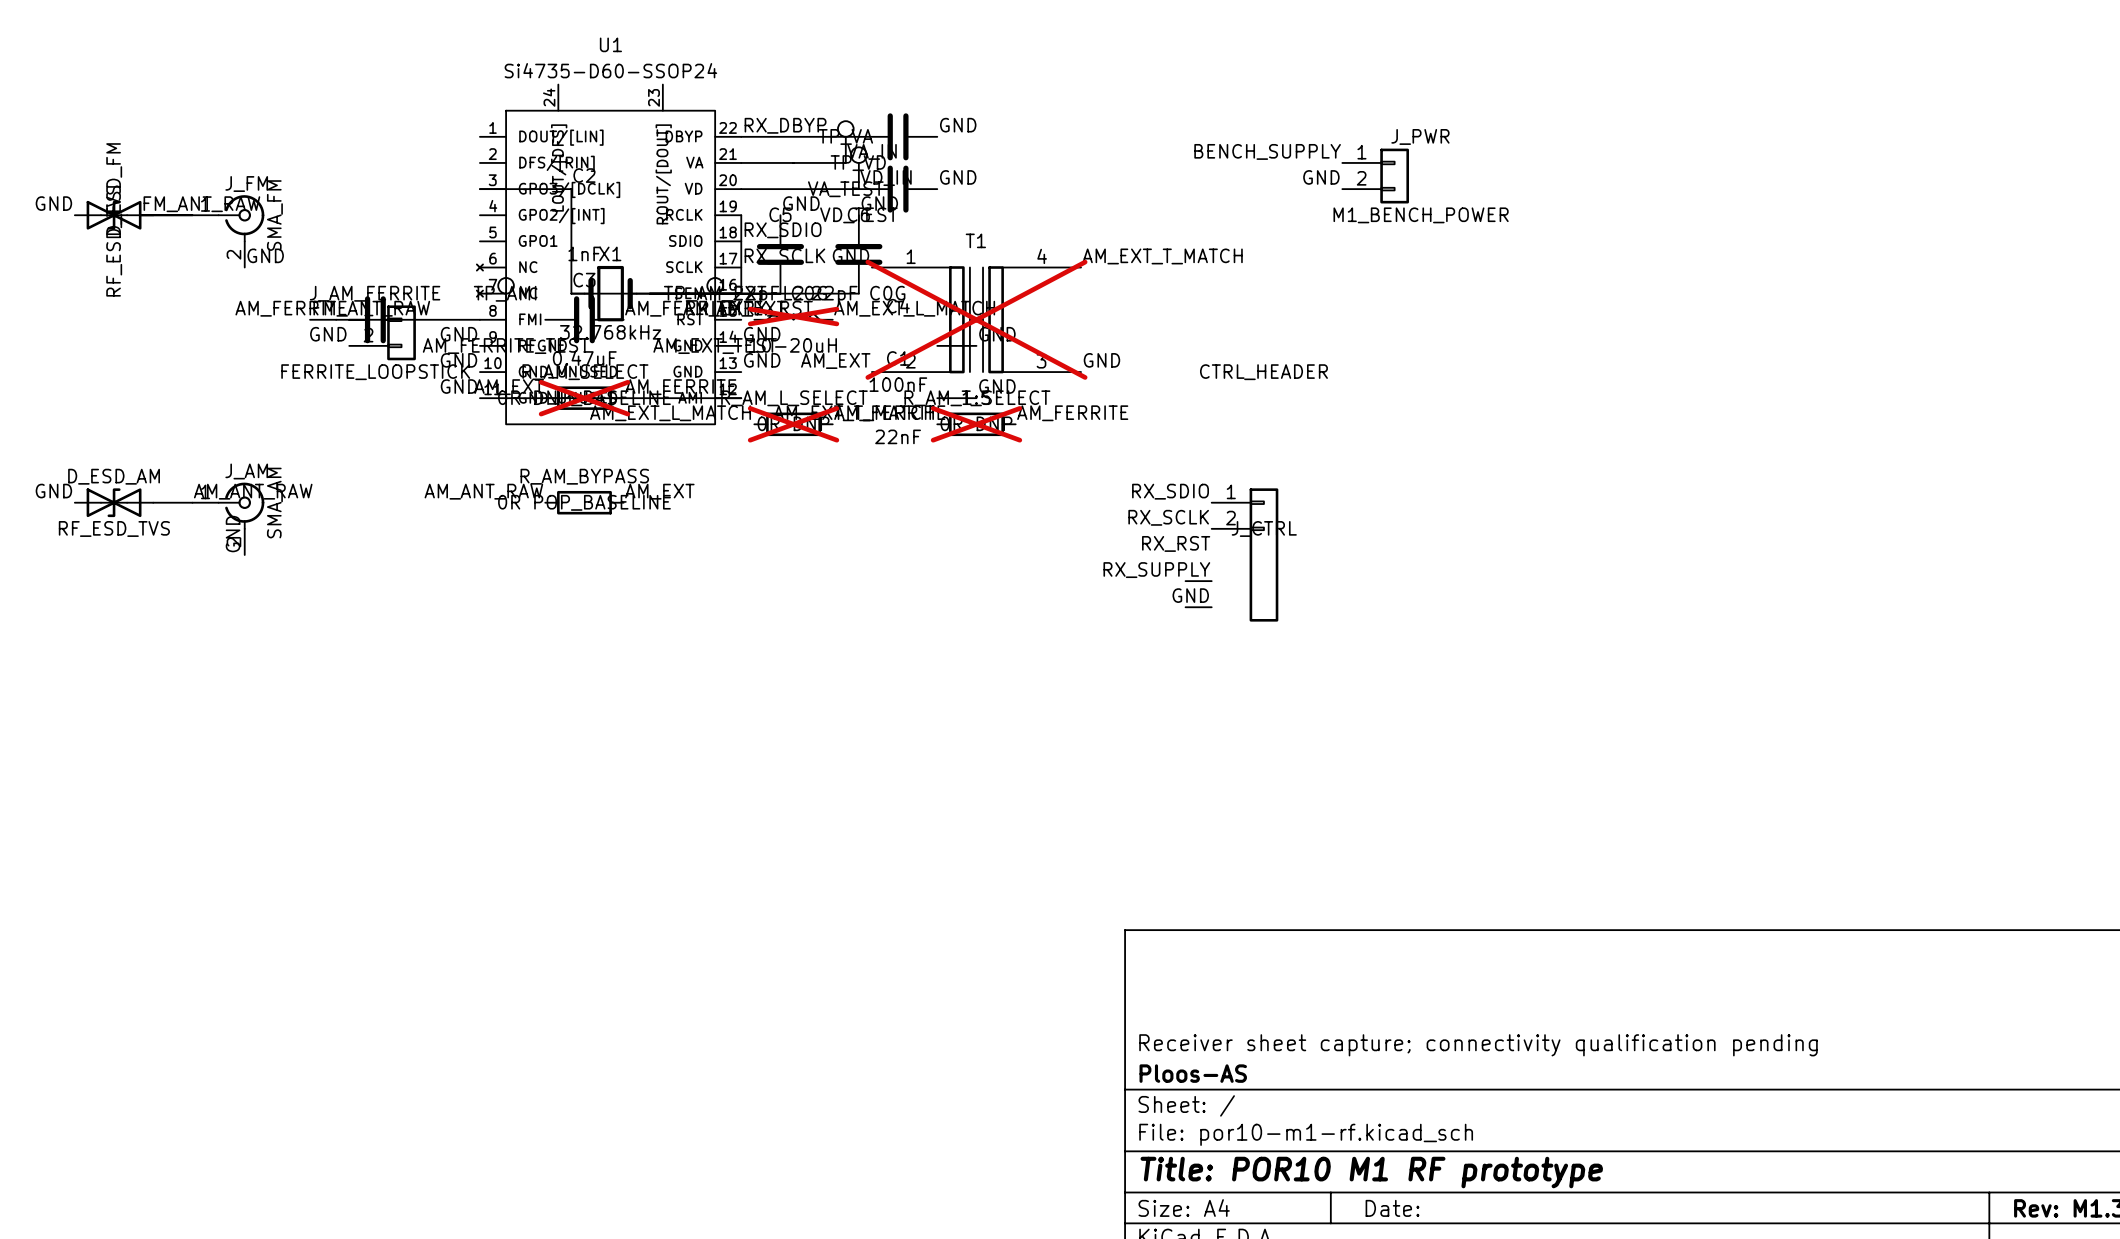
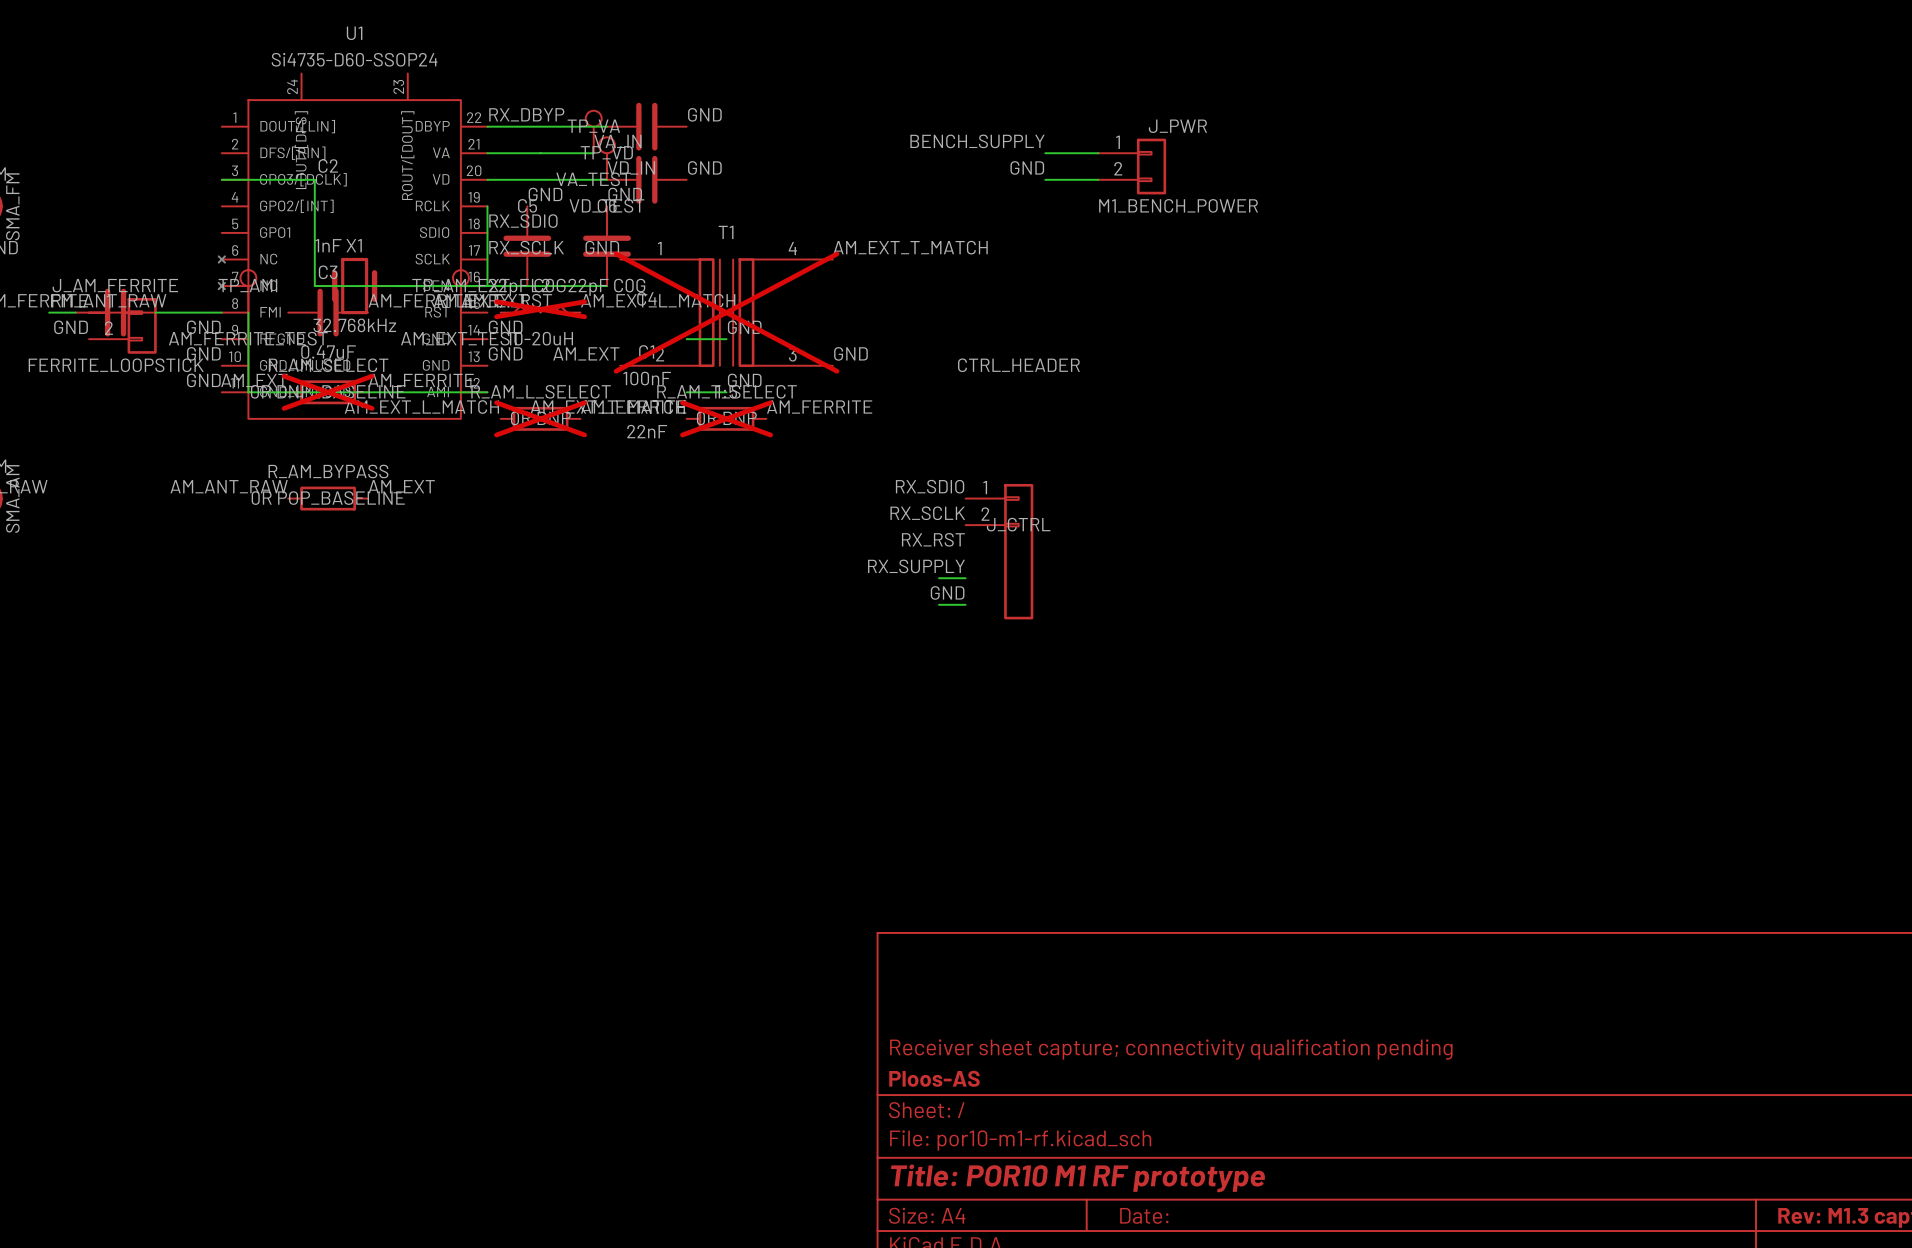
label position: BENCH_SUPPLY (1267, 151) -> BENCH_SUPPLY (977, 141)
wire: none -> (1045, 153) (1098, 153)
label position: GND (1321, 177) -> GND (1027, 167)
wire: none -> (1045, 179) (1098, 179)

